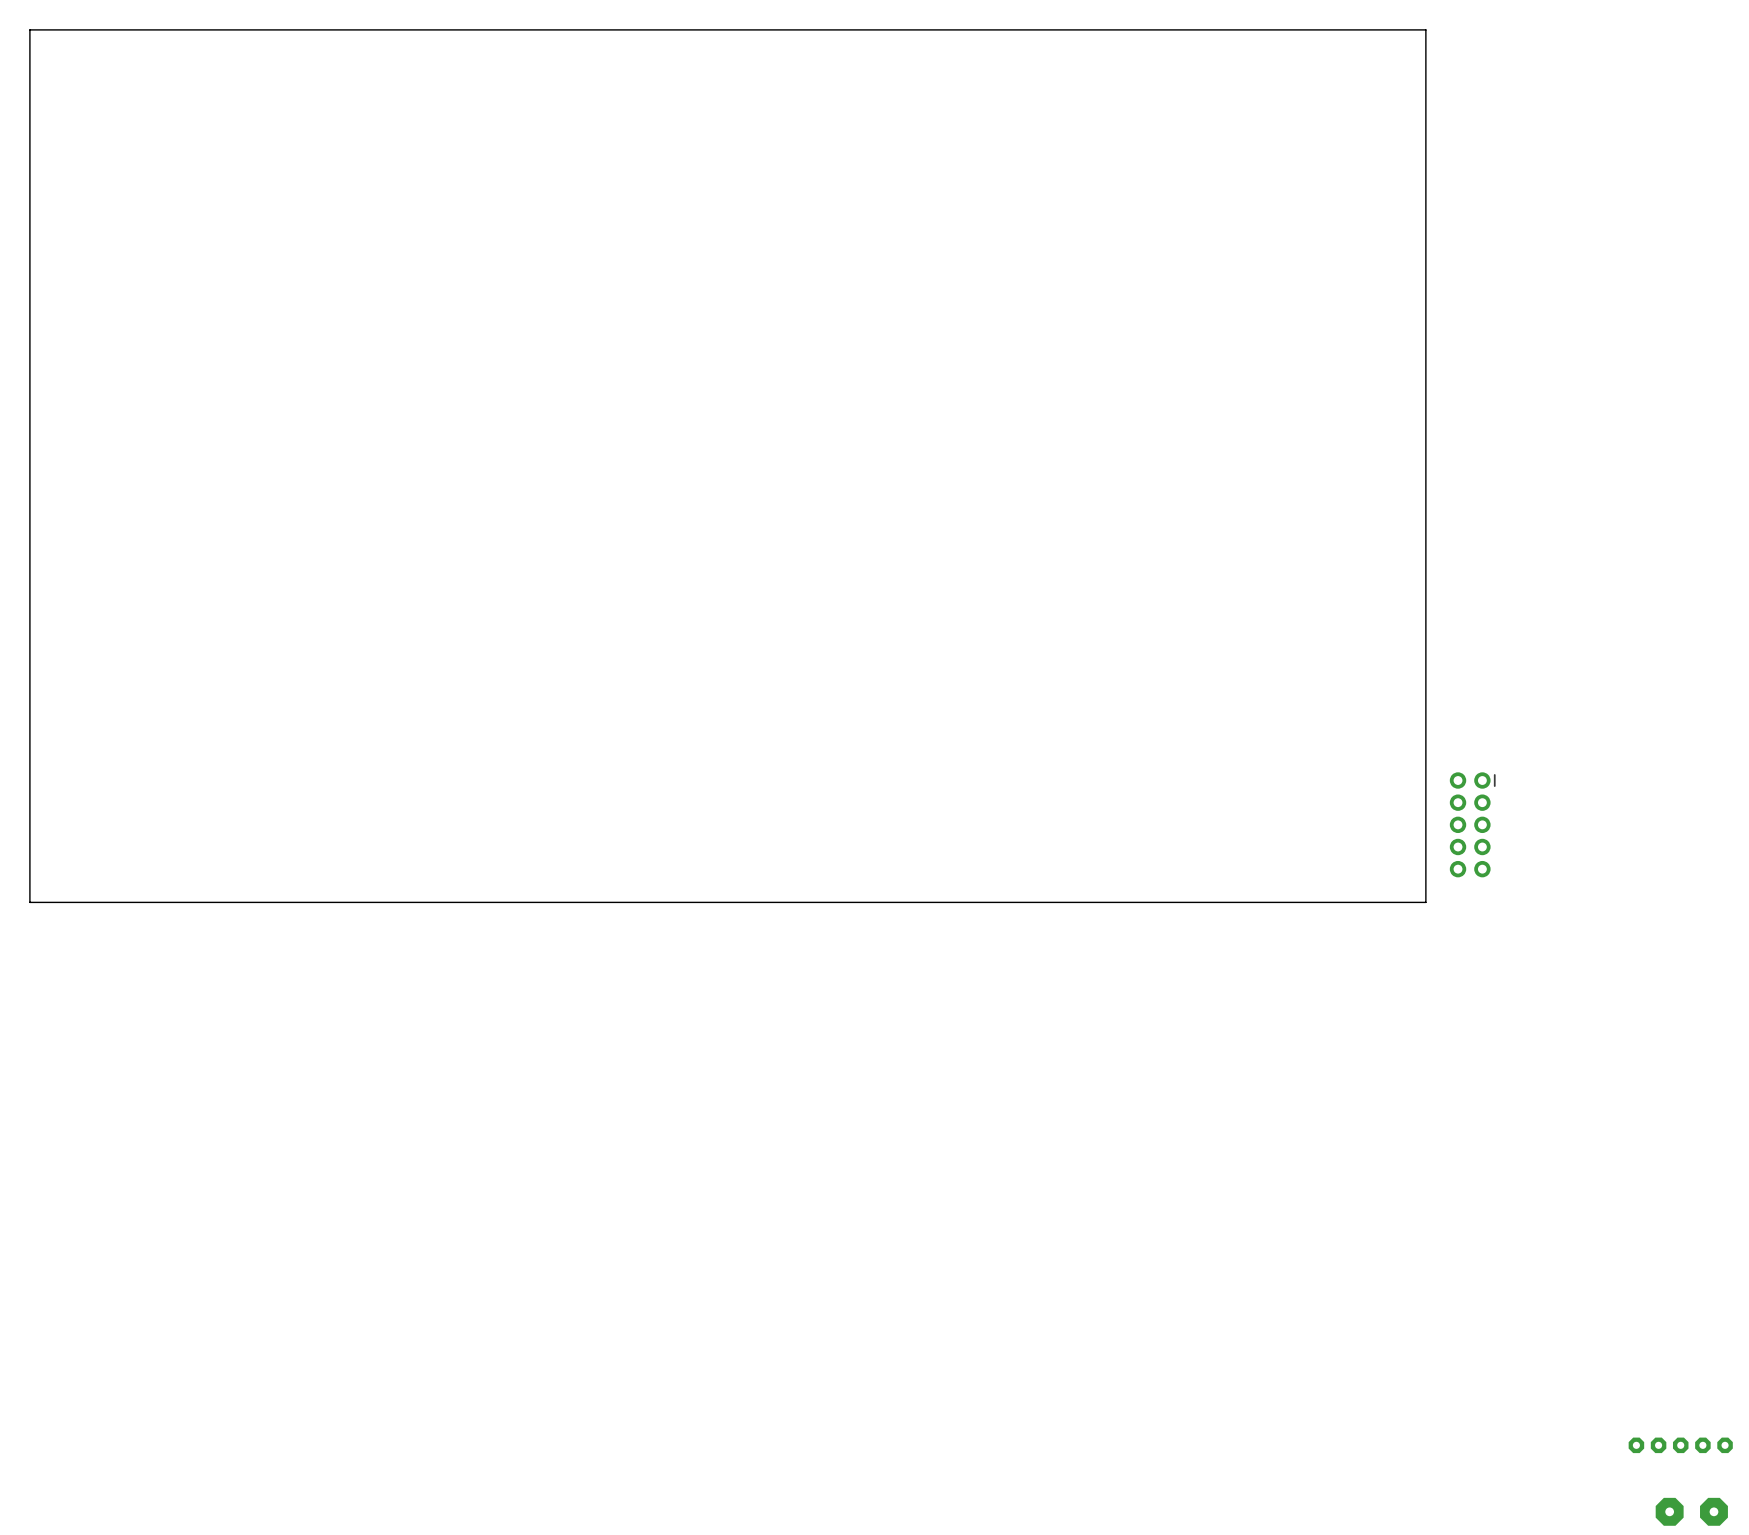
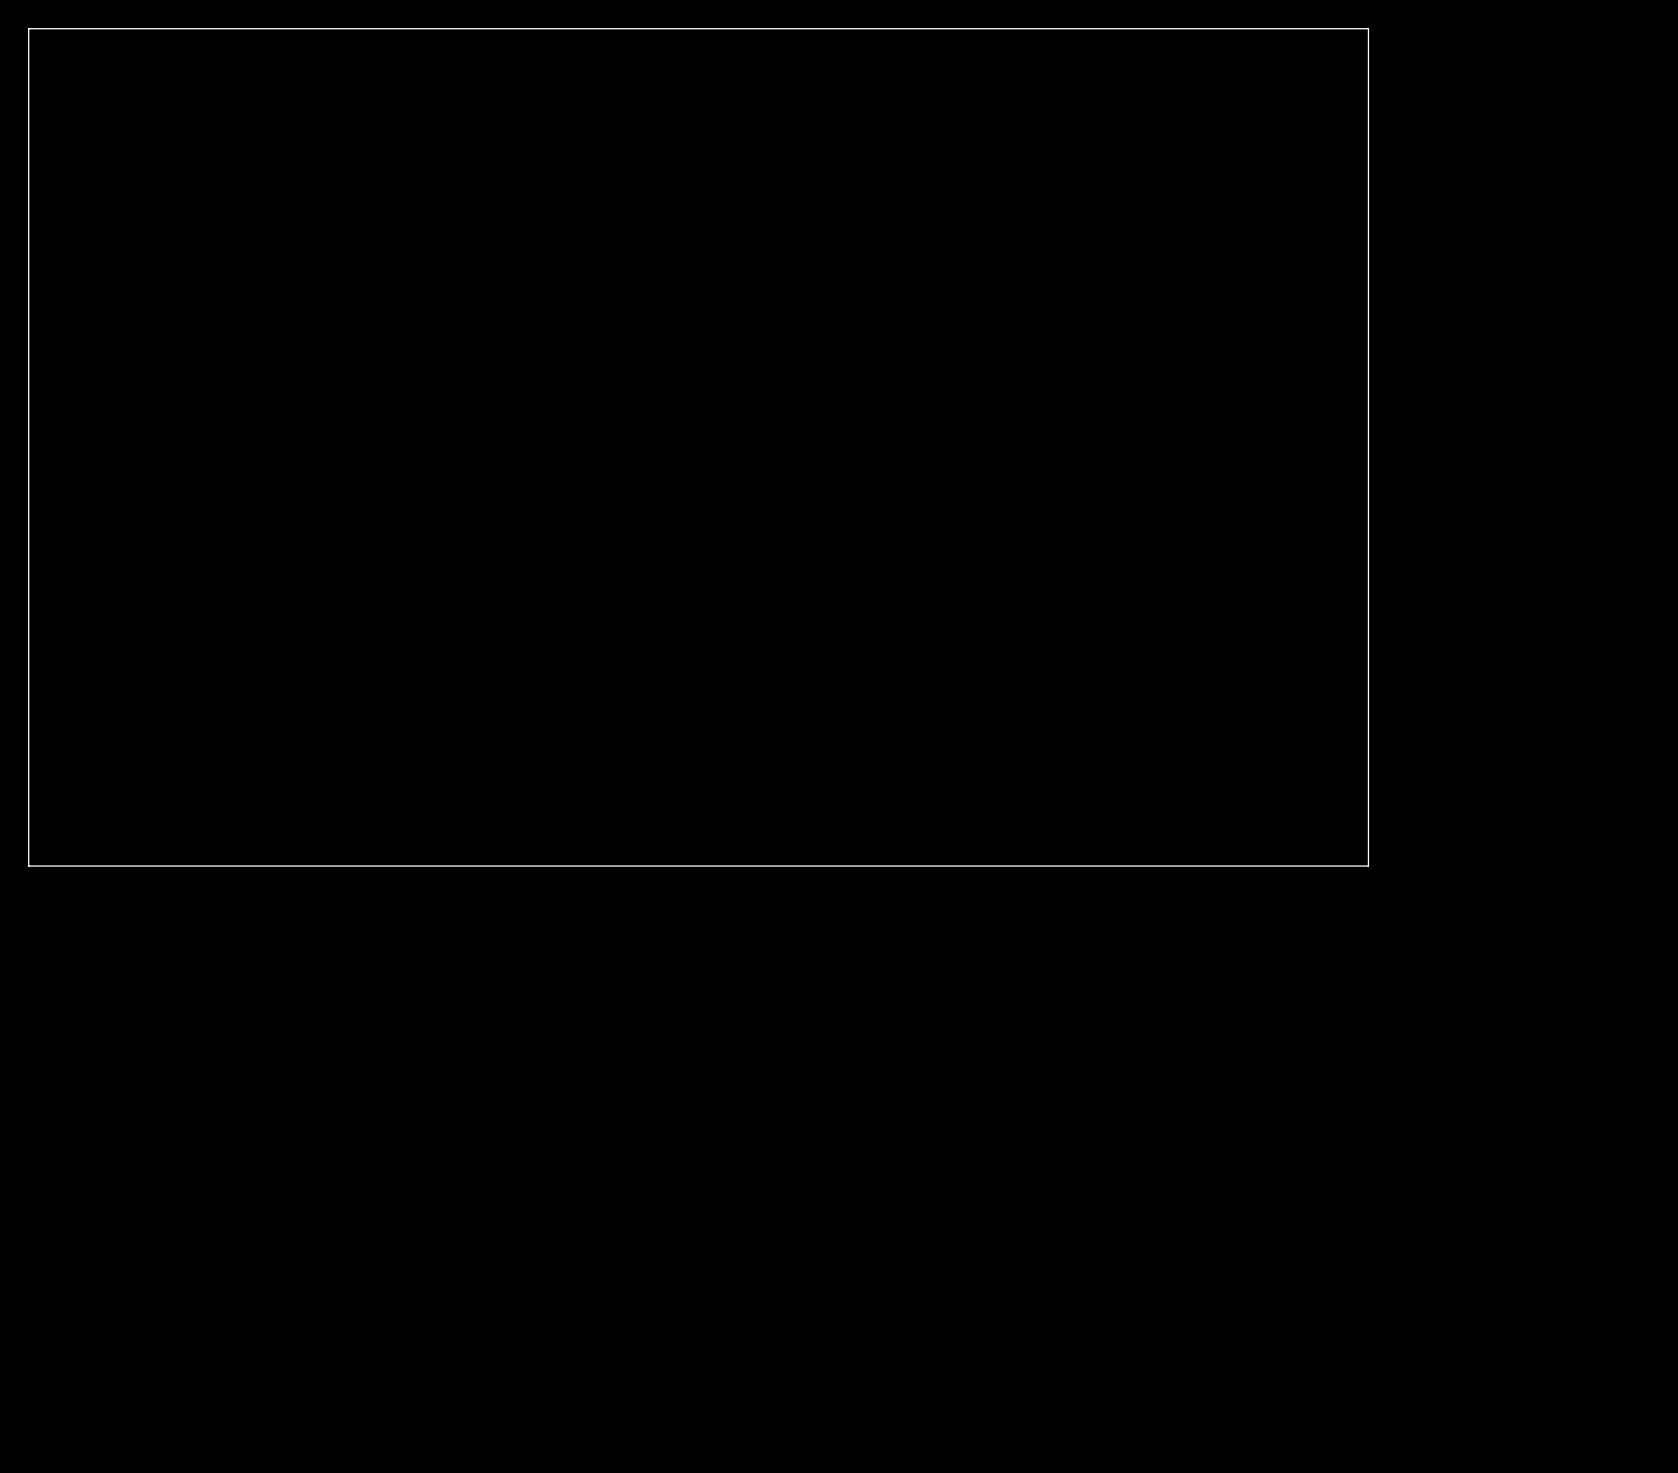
part: (1472, 824) -> none
part: (1680, 1445) -> none
part: (1691, 1511) -> none

